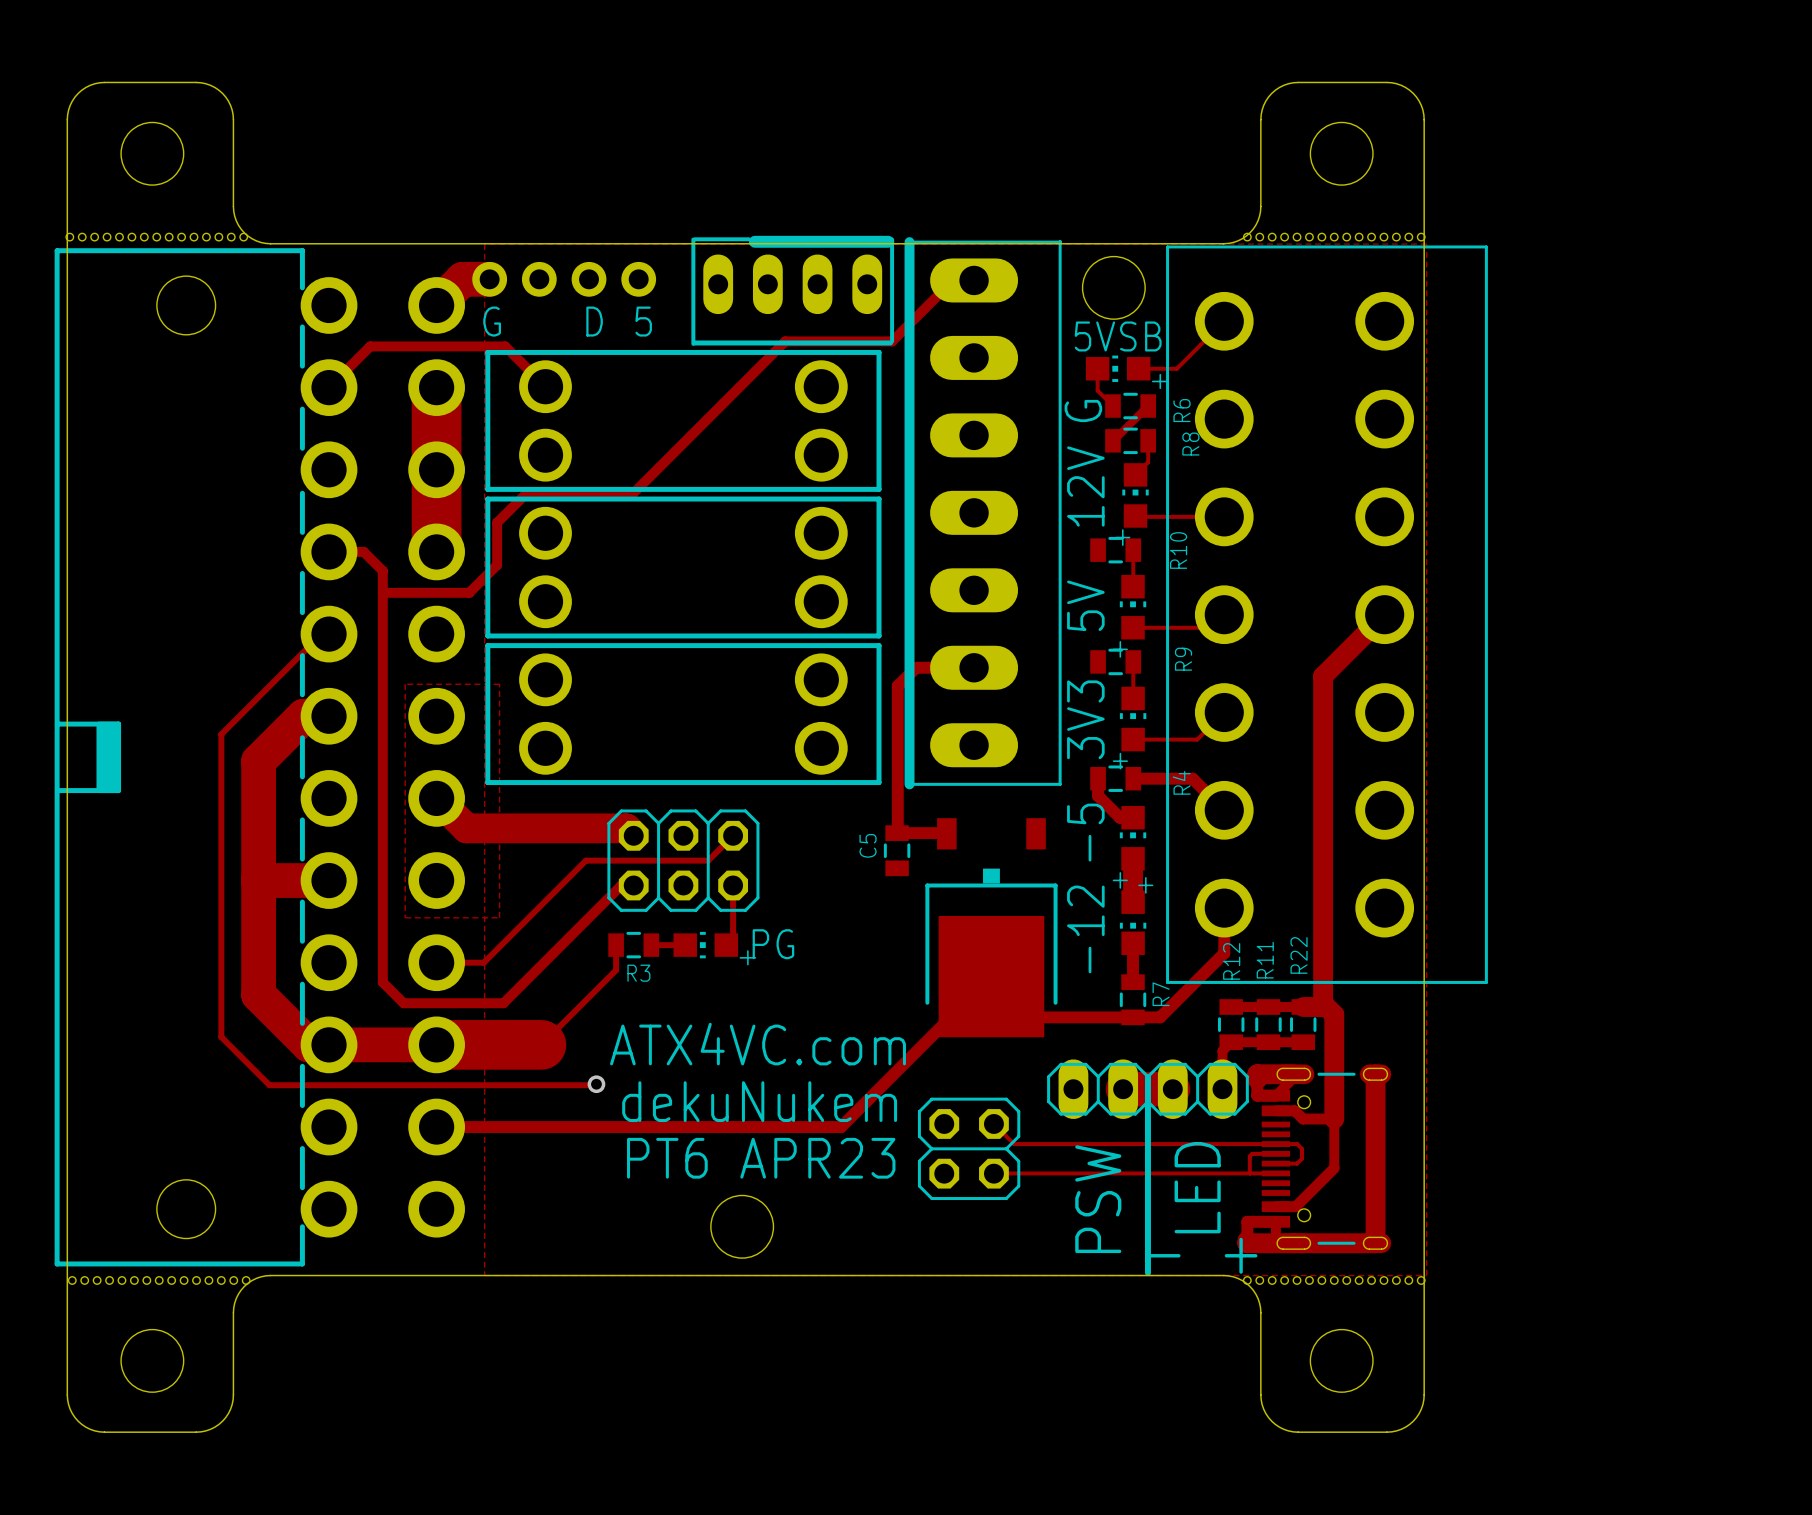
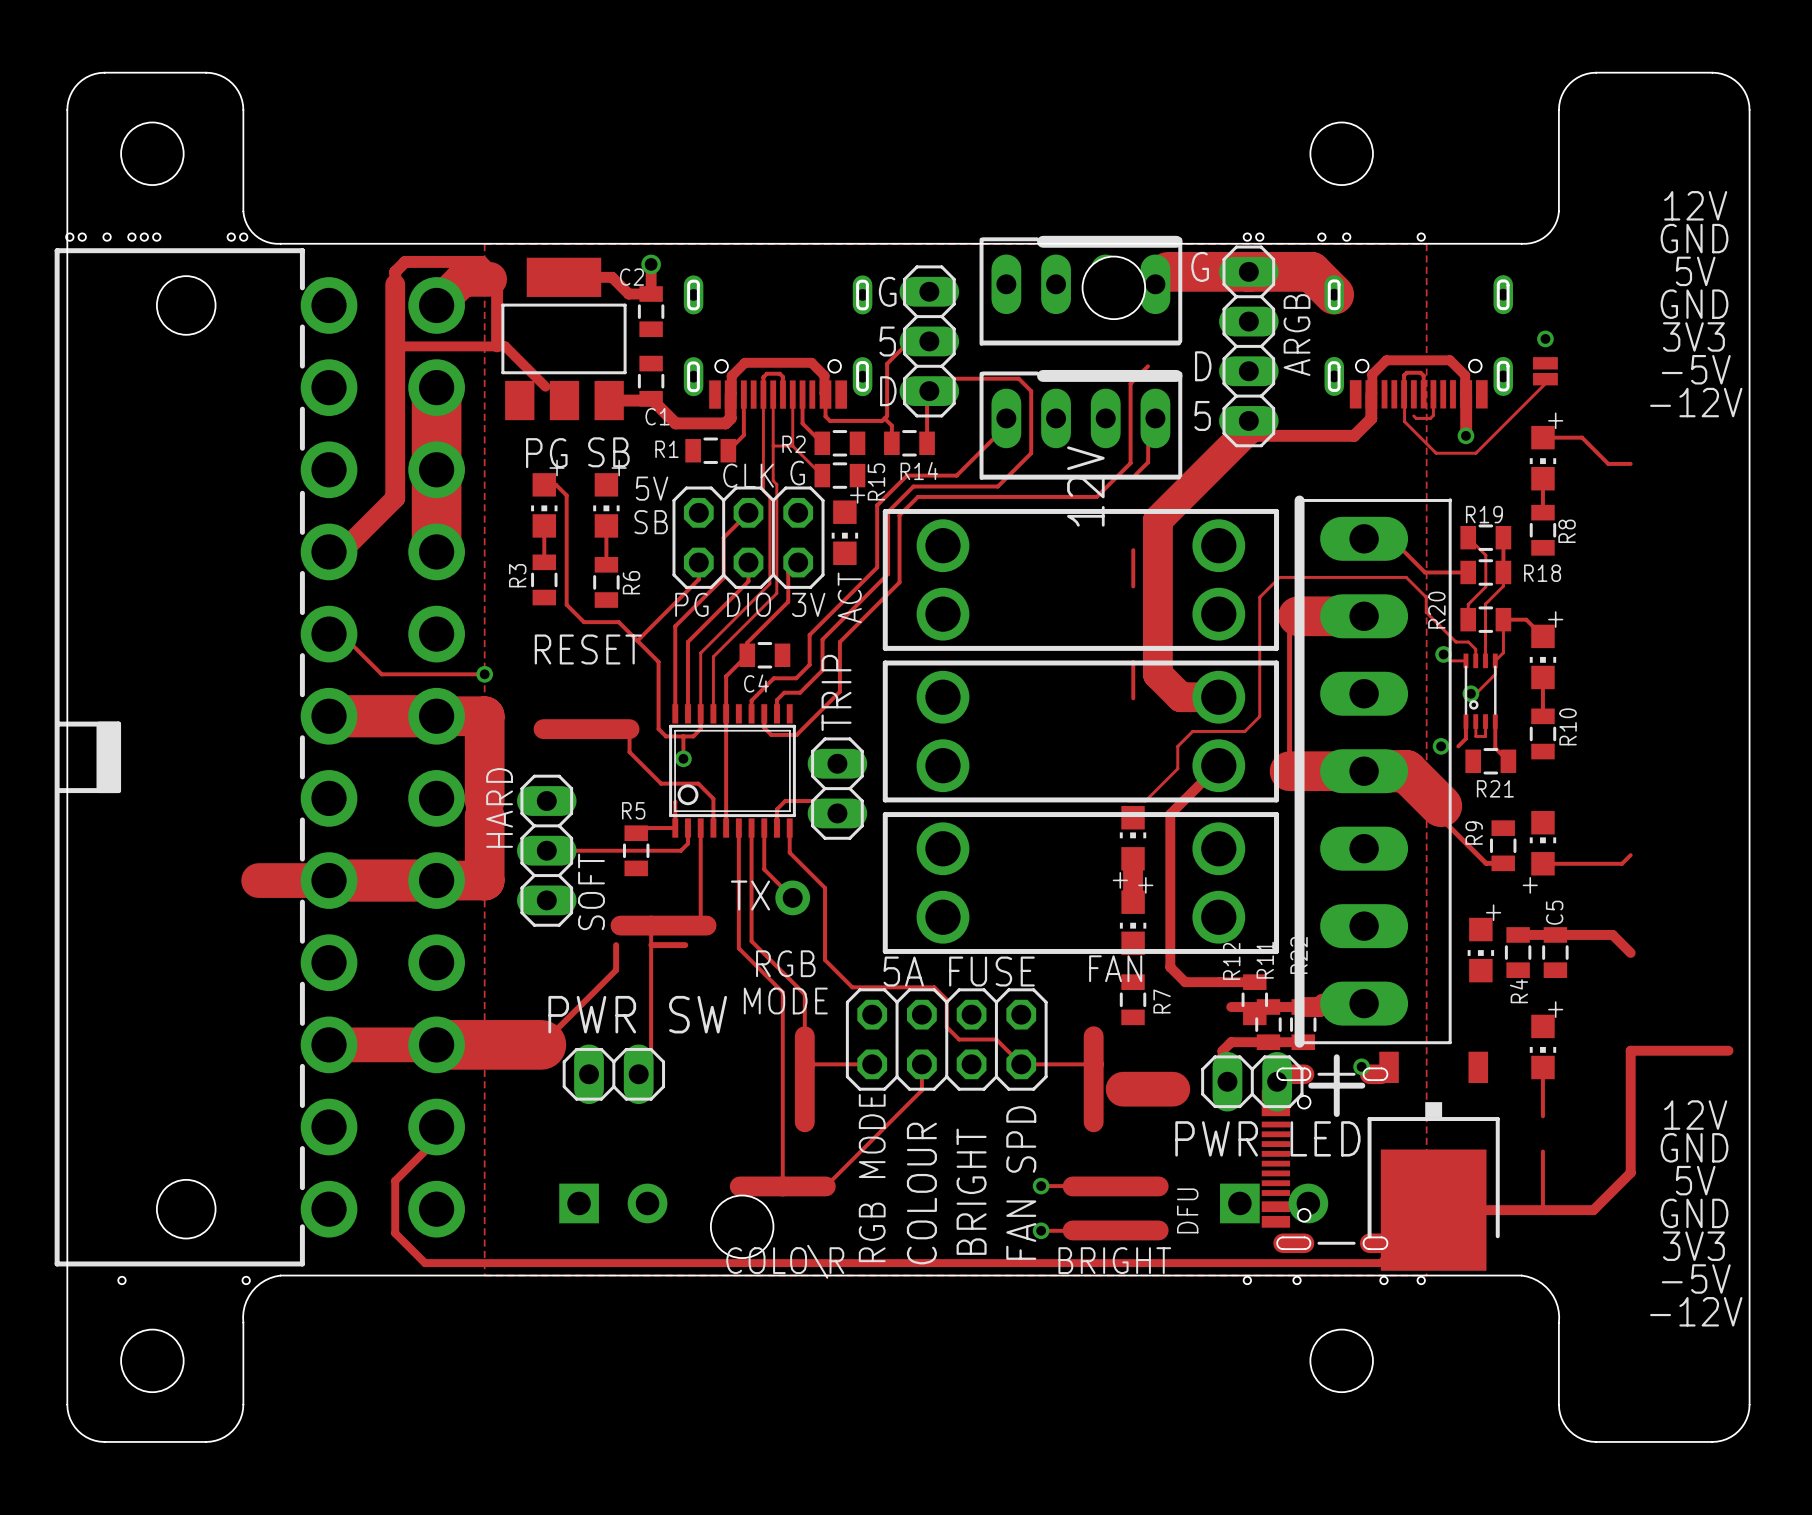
board edge: (67, 119) (68, 110) (75, 97) (85, 87) (94, 83) (196, 82) (214, 87) (228, 101) (233, 114) (233, 206) (236, 220) (241, 229) (252, 238) (265, 243) (280, 243) -> (67, 119) (67, 105) (72, 91) (81, 80) (94, 73) (206, 72) (224, 77) (238, 91) (243, 105) (243, 211) (245, 220) (249, 228) (258, 238) (267, 242) (280, 243)
text: none -> 12V (1695, 205)
hole: (94, 237) -> none
hole: (119, 237) -> none
hole: (169, 237) -> none
hole: (181, 237) -> none
hole: (194, 237) -> none
hole: (206, 237) -> none
hole: (218, 237) -> none
hole: (1272, 237) -> none
hole: (1284, 237) -> none
hole: (1297, 237) -> none
hole: (1309, 237) -> none
hole: (1334, 237) -> none
hole: (1359, 237) -> none
hole: (1371, 237) -> none
hole: (1383, 237) -> none
hole: (1396, 237) -> none
hole: (1408, 237) -> none
text: none -> GND (1694, 238)
board edge: (1223, 243) (1233, 242) (1246, 236) (1255, 225) (1259, 216) (1261, 114) (1265, 101) (1275, 90) (1293, 82) (1386, 82) (1405, 87) (1416, 97) (1422, 110) (1424, 119) (1424, 1394) (1422, 1404) (1416, 1417) (1405, 1427) (1386, 1432) (1293, 1431) (1275, 1424) (1265, 1413) (1261, 1399) (1260, 1312) (1258, 1298) (1253, 1290) (1242, 1280) (1223, 1275) -> (1223, 243) (1526, 243) (1535, 242) (1550, 232) (1558, 215) (1559, 105) (1563, 91) (1577, 77) (1596, 72) (1717, 73) (1734, 80) (1744, 91) (1748, 100) (1749, 1404) (1746, 1418) (1734, 1434) (1717, 1441) (1596, 1441) (1577, 1436) (1563, 1423) (1559, 1409) (1557, 1306) (1546, 1287) (1527, 1276) (1223, 1275)
track: none -> (651, 264) (651, 294) (628, 294) (612, 277) (563, 277)
via: none -> (651, 264)
text: none -> G (1200, 266)
text: none -> 5V (1695, 271)
part: (564, 279) -> none
track: (974, 280) (953, 280) (892, 341) (785, 341) (632, 493) (525, 493) (497, 522) (497, 565) (469, 592) (382, 592) -> none
track: none -> (1155, 284) (1167, 271) (1311, 271) (1334, 294)
part: (792, 290) -> none
part: none -> (1081, 290)
text: none -> G (887, 291)
text: none -> GND (1694, 304)
C2: none -> (651, 311)
text: G (492, 321) -> none
text position: D (594, 321) -> D (888, 391)
text position: 5 (643, 321) -> 5 (887, 341)
track: (1224, 321) (1176, 368) (1138, 368) -> none
text: none -> ARGB (1297, 335)
text: 5VSB (1118, 336) -> none
text: none -> 3V3 (1693, 336)
part: none -> (563, 338)
via: none -> (1545, 338)
track: none -> (929, 341) (909, 341) (887, 363) (887, 415) (882, 420) (829, 420) (825, 416) (824, 375) (811, 362) (745, 362) (731, 376) (730, 418) (725, 423) (675, 423) (651, 398) (649, 400) (609, 400)
part: none -> (929, 341)
part: none -> (1418, 341)
part: none -> (778, 342)
track: (395, 346) (370, 346) (329, 387) -> none
track: none -> (497, 346) (497, 276) (482, 261) (405, 261) (395, 271) (395, 498) (341, 551)
part: none -> (1248, 346)
track: none -> (1147, 366) (1130, 383) (1130, 463) (1096, 496) (917, 496) (899, 515) (899, 582) (839, 642) (839, 691) (796, 734) (771, 734) (764, 727) (764, 713)
text: none -> D (1203, 366)
track: (1097, 368) (1097, 390) (1112, 406) -> none
part: (1118, 368) -> none
text: none -> -5V (1696, 369)
part: none -> (1545, 371)
track: none -> (1545, 379) (1545, 383) (1475, 453) (1436, 453) (1404, 421) (1404, 375) (1406, 372) (1420, 372) (1423, 375) (1423, 394)
C1: none -> (651, 381)
track: none -> (743, 394) (743, 435) (728, 450)
track: none -> (773, 394) (773, 480) (776, 484) (776, 593) (713, 656) (713, 713)
track: none -> (782, 394) (782, 376) (779, 373) (766, 373) (763, 377) (763, 491) (769, 497) (769, 583) (700, 653) (700, 728) (693, 736) (666, 736) (658, 728) (658, 661) (618, 622) (584, 622) (566, 604) (566, 495) (556, 484) (544, 484)
track: none -> (792, 394) (792, 446)
track: none -> (802, 394) (802, 423) (822, 443)
track: none -> (1433, 394) (1433, 415) (1430, 418) (1416, 418) (1413, 415)
text: none -> -12V (1696, 402)
R6 rotation: 0° (1130, 406) -> 90° clockwise (606, 582)
R6 position: (1130, 406) -> (606, 582)
track: (1148, 406) (1113, 440) -> none
text: G (1083, 410) -> none
text: none -> 5 (1202, 415)
track: none -> (884, 418) (891, 425) (891, 443)
track: none -> (1006, 418) (1006, 425) (956, 475) (907, 475) (877, 505) (877, 567) (809, 635) (809, 664) (796, 678) (773, 678) (751, 700) (751, 713)
part: (683, 420) -> none
part: none -> (1081, 425)
track: none -> (1248, 429) (1255, 435) (1354, 435) (1371, 418) (1372, 374) (1386, 360) (1450, 360) (1465, 375) (1466, 435)
track: none -> (1248, 429) (1157, 520) (1157, 674) (1180, 697) (1218, 697)
via: none -> (1465, 435)
track: none -> (1542, 437) (1582, 437) (1608, 463) (1630, 463)
R8 rotation: 0° (1130, 440) -> 90° clockwise (1542, 530)
R8 position: (1130, 440) -> (1542, 530)
R2: none -> (839, 443)
R14: none -> (909, 443)
track: none -> (927, 443) (927, 393) (941, 378) (1018, 378) (1031, 391) (1031, 453) (997, 486) (913, 486) (888, 511) (888, 573) (822, 639) (822, 670) (800, 692) (784, 692) (776, 699) (776, 713)
track: none -> (773, 446) (792, 446)
track: none -> (792, 446) (822, 475)
R1: none -> (710, 450)
text: none -> SB (608, 452)
text: none -> PG (546, 453)
part: none -> (1542, 458)
text: none -> G (797, 473)
text: none -> CLK (748, 475)
R15: none -> (839, 475)
track: none -> (1542, 478) (1542, 512)
text: none -> 5V (652, 488)
part: (1135, 495) -> none
part: none -> (544, 505)
part: none -> (606, 505)
track: none -> (748, 512) (723, 537) (723, 577) (675, 626) (675, 713)
part position: (983, 513) -> (1373, 771)
track: (1135, 516) (1224, 516) -> none
text: none -> SB (651, 522)
track: none -> (544, 525) (544, 562)
track: none -> (606, 525) (606, 564)
part: none -> (844, 532)
track: none -> (1468, 537) (1485, 555) (1485, 586) (1468, 604) (1468, 619)
R19: none -> (1485, 537)
track: none -> (1503, 537) (1503, 586) (1485, 604) (1485, 660)
track: none -> (1364, 538) (1391, 538) (1425, 572) (1468, 572)
R10 rotation: 0° (1115, 550) -> 90° clockwise (1542, 733)
R10 position: (1115, 550) -> (1542, 733)
track: (329, 551) (363, 551) (382, 570) (382, 982) (403, 1003) (503, 1003) (621, 885) (633, 885) -> none
track: none -> (698, 562) (698, 579) (637, 640)
track: none -> (748, 562) (748, 581) (687, 641) (687, 713)
track: none -> (798, 562) (788, 572) (788, 601) (747, 642) (747, 655) (726, 676) (726, 828)
part: (683, 567) -> none
R18: none -> (1485, 572)
part: none -> (1080, 579)
text: none -> ACT (849, 597)
text: none -> PG (691, 604)
text: none -> DIO (749, 604)
text: none -> 3V (808, 604)
text: 5V (1085, 605) -> none
part: (1133, 607) -> none
track: (1224, 614) (1211, 627) (1133, 627) -> none
part: (1326, 614) -> none
track: (1384, 614) (1323, 676) (1323, 1003) (1334, 1014) (1334, 1119) -> none
track: none -> (1364, 616) (1297, 616) (1289, 624) (1289, 771) (1406, 771) (1441, 805) (1441, 818) (1486, 863) (1503, 863)
R20: none -> (1485, 619)
track: (329, 634) (321, 634) (221, 734) (221, 1037) (269, 1085) (596, 1084) -> none
track: none -> (341, 634) (381, 674) (484, 674)
track: none -> (1542, 636) (1526, 619) (1503, 619) (1503, 652) (1495, 660) (1495, 674) (1475, 693) (1470, 693)
text: none -> RESET (588, 649)
track: none -> (1443, 654) (1450, 660) (1465, 660)
via: none -> (1443, 654)
C4: none -> (764, 655)
part: none -> (1542, 656)
R9 name position: R9 (1183, 659) -> R9 (1474, 833)
track: none -> (1475, 660) (1475, 649) (1468, 642) (1456, 642) (1426, 612) (1426, 597) (1406, 577) (1279, 577) (1259, 597) (1259, 716) (1244, 731) (1192, 731) (1177, 746) (1177, 768) (1145, 801) (1128, 801)
R9 rotation: 0° (1115, 661) -> 90° clockwise (1503, 845)
R9 position: (1115, 661) -> (1503, 845)
track: (974, 667) (916, 667) (897, 685) (897, 833) (946, 833) -> none
via: none -> (484, 674)
zone outline: (405, 684) (405, 917) (499, 917) (499, 684) (405, 684) -> none
part: none -> (1480, 691)
text: none -> TRIP (836, 692)
via: none -> (1470, 693)
track: (1224, 712) (1197, 739) (1133, 739) -> none
part: (683, 714) -> none
track: (329, 716) (303, 716) (258, 761) (258, 994) (308, 1044) (341, 1044) -> none
track: none -> (341, 716) (484, 716) (484, 801)
text: 3V3 (1085, 719) -> none
part: (1133, 719) -> none
track: none -> (1465, 721) (1465, 738) (1458, 746)
track: none -> (1475, 721) (1475, 736) (1485, 736) (1485, 721)
track: none -> (1495, 721) (1495, 748) (1508, 761)
track: none -> (543, 729) (629, 729) (629, 752) (661, 783) (698, 783) (713, 798) (713, 828)
part: none -> (1080, 731)
track: none -> (683, 736) (683, 758)
via: none -> (1441, 746)
via: none -> (683, 758)
R21: none -> (1490, 761)
track: none -> (1218, 765) (1170, 814) (1170, 967) (1185, 982) (1254, 982)
part: none -> (732, 770)
track: (1098, 778) (1098, 795) (1119, 817) (1133, 817) -> none
R4 rotation: 0° (1115, 778) -> 90° clockwise (1518, 952)
R4 position: (1115, 778) -> (1518, 952)
track: (1133, 778) (1192, 778) (1224, 810) -> none
part: none -> (837, 788)
track: (436, 798) (466, 828) (626, 828) (633, 835) -> none
track: none -> (675, 802) (675, 828) (641, 828) (636, 833)
text: none -> HARD (499, 807)
track: none -> (837, 813) (825, 801) (785, 801) (776, 809) (776, 828)
track: none -> (484, 815) (484, 880) (341, 880)
track: none -> (687, 828) (687, 843) (680, 850) (546, 850)
track: none -> (700, 828) (700, 919) (706, 925) (620, 925)
track: none -> (738, 828) (738, 948) (782, 992) (782, 1186)
track: none -> (751, 828) (751, 941) (804, 994) (804, 1122)
track: none -> (764, 828) (764, 869) (792, 897)
track: none -> (789, 828) (789, 852) (825, 887) (825, 960) (852, 987) (934, 987) (946, 999) (946, 1027) (959, 1039) (996, 1039) (1021, 1064) (1093, 1064)
text: -5 (1085, 832) -> none
track: (733, 835) (708, 860) (585, 860) (483, 962) (436, 962) -> none
part: none -> (1542, 843)
C5 name position: C5 (868, 845) -> C5 (1554, 912)
part: none -> (546, 850)
R5: none -> (636, 850)
C5 position: (897, 850) -> (1555, 952)
track: none -> (1630, 855) (1622, 863) (1542, 863)
part position: (683, 860) -> (748, 537)
part: none -> (1080, 883)
track: (733, 885) (733, 938) (726, 945) -> none
text: none -> SOFT (591, 891)
text: none -> TX (750, 895)
part: none -> (792, 897)
track: (1224, 908) (1224, 953) (1160, 1017) (1032, 1017) (991, 976) (841, 1127) (436, 1127) -> none
track: none -> (651, 925) (651, 1061) (638, 1074)
part: (991, 927) -> none
text: -12 (1085, 929) -> none
track: none -> (1518, 934) (1612, 934) (1630, 952)
track: (1133, 943) (1133, 982) -> (1542, 677) (1542, 716)
text: PG (773, 944) -> none
R3 rotation: 0° (633, 945) -> 90° clockwise (544, 579)
R3 position: (633, 945) -> (544, 579)
part: (705, 945) -> none
part: none -> (1480, 950)
text: none -> RGB (785, 963)
text: none -> FAN (1115, 968)
text: none -> 5A FUSE (959, 971)
R7 name position: R7 (1161, 994) -> R7 (1162, 1001)
text: none -> MODE (785, 1001)
text: none -> PWR SW (637, 1014)
R12 position: (1231, 1024) -> (1254, 999)
track: none -> (1093, 1036) (1093, 1122)
part: none -> (946, 1039)
text: ATX4VC.com (758, 1044) -> none
part: none -> (1542, 1046)
track: none -> (1728, 1050) (1630, 1050) (1630, 1172) (1593, 1210) (1433, 1210) (1380, 1263) (425, 1263) (395, 1233) (395, 1180) (449, 1127)
track: none -> (804, 1064) (872, 1064)
track: none -> (921, 1064) (921, 1090) (825, 1186) (739, 1186)
via: none -> (1361, 1066)
track: none -> (1542, 1067) (1542, 1116)
part: none -> (613, 1074)
track: (1257, 1074) (1257, 1095) (1275, 1095) (1293, 1077) (1293, 1074) (1257, 1074) -> none
track: (1375, 1074) (1375, 1243) (1247, 1243) (1247, 1221) (1275, 1221) (1275, 1243) (1293, 1243) -> none
line: (1147, 1076) (1147, 1273) -> none
via: (596, 1084) -> none
text: none -> + (1336, 1085)
part: (1098, 1089) -> none
part position: (1197, 1089) -> (1252, 1081)
text: dekuNukem (759, 1101) -> none
track: (1275, 1110) (1294, 1110) (1302, 1119) (1334, 1119) -> none
text: none -> 12V (1695, 1115)
track: (1334, 1119) (1334, 1168) (1295, 1206) (1275, 1206) -> none
track: (993, 1123) (1014, 1144) (1297, 1144) (1301, 1148) (1301, 1158) (1297, 1163) (1275, 1163) -> none
text: none -> PWR LED (1267, 1138)
text: none -> GND (1694, 1147)
part: (969, 1148) -> none
track: none -> (1542, 1151) (1542, 1210)
track: (1275, 1153) (1252, 1153) (1249, 1156) (1249, 1173) -> none
text: PT6 APR23 (761, 1158) -> none
part: none -> (1433, 1161)
track: (994, 1173) (1275, 1173) -> none
text: none -> RGB MODE (872, 1178)
text: none -> 5V (1695, 1180)
text: none -> FAN SPD (1021, 1183)
track: none -> (1041, 1186) (1158, 1186)
via: none -> (1041, 1186)
text: LED (1197, 1187) -> none
text: none -> BRIGHT (971, 1191)
text: none -> COLOUR (921, 1193)
text: PSW (1098, 1199) -> none
part: none -> (613, 1203)
part: none -> (1274, 1203)
text: none -> DFU (1187, 1210)
text: none -> GND (1694, 1213)
via: none -> (1041, 1230)
track: none -> (1158, 1230) (1041, 1230)
text: none -> 3V3 (1693, 1246)
text: - + (1202, 1255) -> none
text: none -> BRIGHT (1114, 1260)
text: none -> COLO\R (785, 1261)
board edge: (280, 1275) (265, 1275) (252, 1280) (241, 1290) (236, 1298) (233, 1312) (233, 1399) (228, 1413) (214, 1427) (196, 1432) (94, 1430) (85, 1427) (75, 1417) (68, 1404) (67, 1394) -> (280, 1275) (260, 1283) (249, 1296) (244, 1306) (243, 1409) (238, 1423) (224, 1436) (206, 1441) (94, 1440) (81, 1434) (72, 1423) (67, 1409) (67, 1394)
text: none -> -5V (1696, 1278)
hole: (72, 1280) -> none
hole: (84, 1280) -> none
hole: (97, 1280) -> none
hole: (109, 1280) -> none
hole: (134, 1280) -> none
hole: (146, 1280) -> none
hole: (159, 1280) -> none
hole: (171, 1280) -> none
hole: (184, 1280) -> none
hole: (196, 1280) -> none
hole: (208, 1280) -> none
hole: (221, 1280) -> none
hole: (233, 1280) -> none
hole: (1259, 1280) -> none
hole: (1272, 1280) -> none
hole: (1284, 1280) -> none
hole: (1309, 1280) -> none
hole: (1321, 1280) -> none
hole: (1334, 1280) -> none
hole: (1346, 1280) -> none
hole: (1359, 1280) -> none
hole: (1371, 1280) -> none
hole: (1396, 1280) -> none
hole: (1408, 1280) -> none
text: none -> -12V (1696, 1311)

